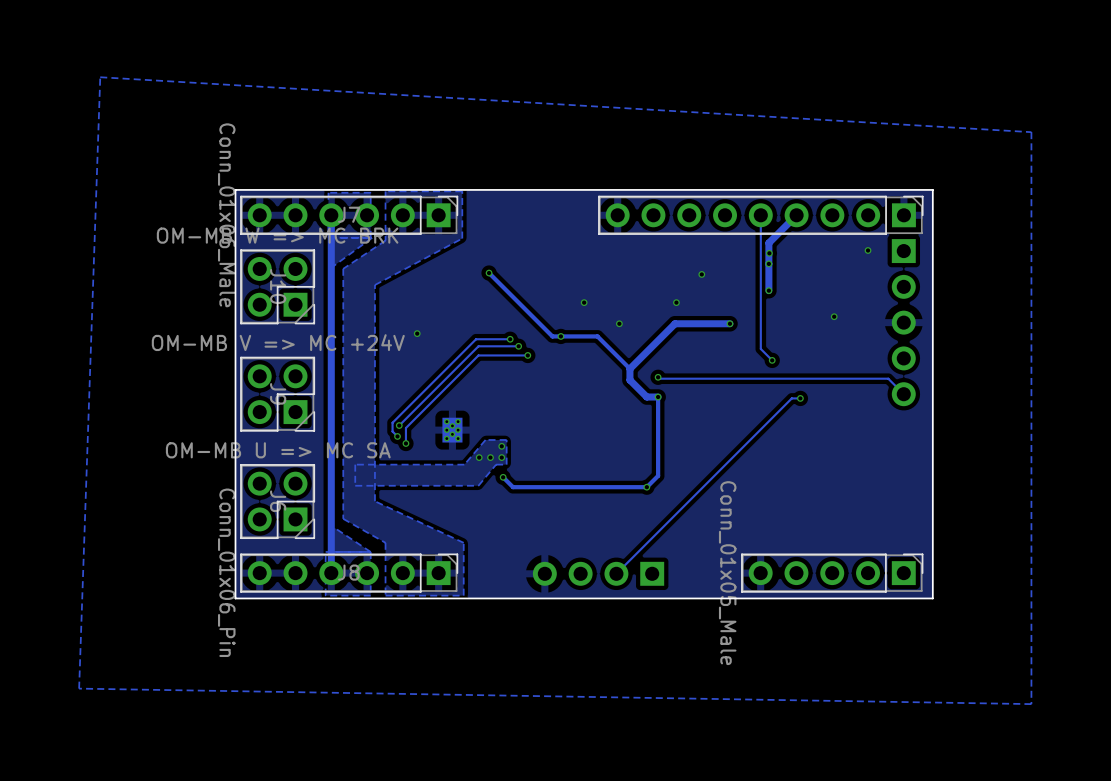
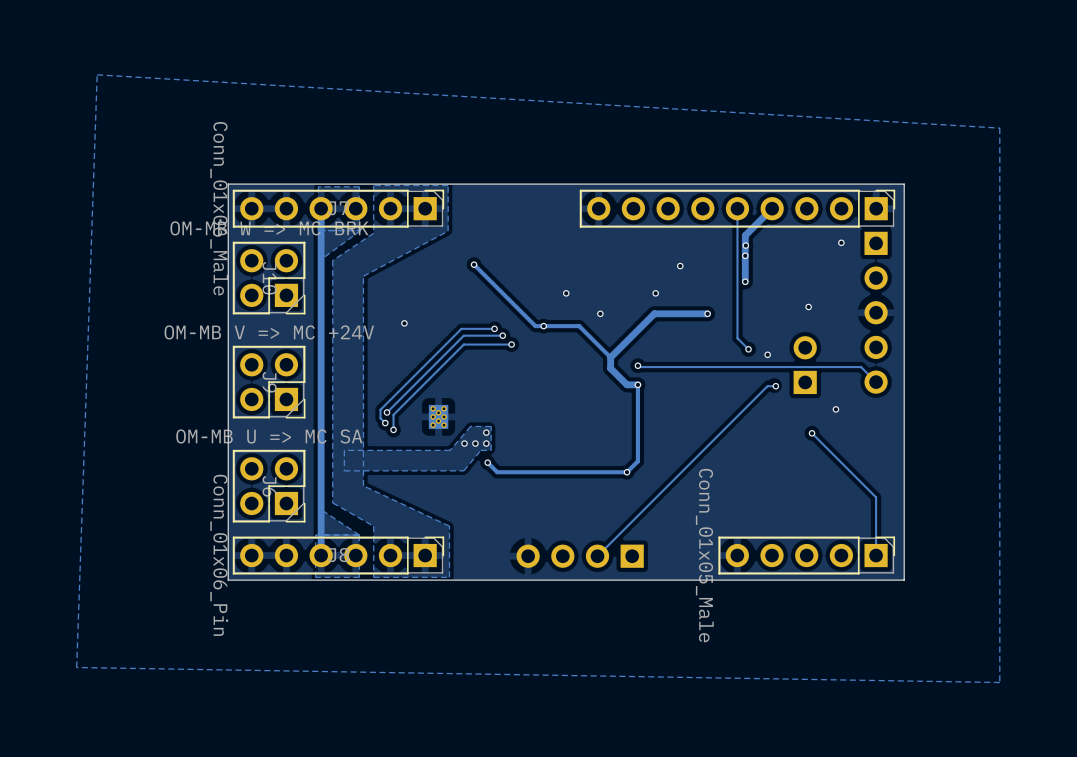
via: none -> (767, 354)
part: none -> (805, 365)
via: none -> (835, 409)
track: none -> (812, 433) (876, 497) (876, 555)
via: none -> (812, 433)

